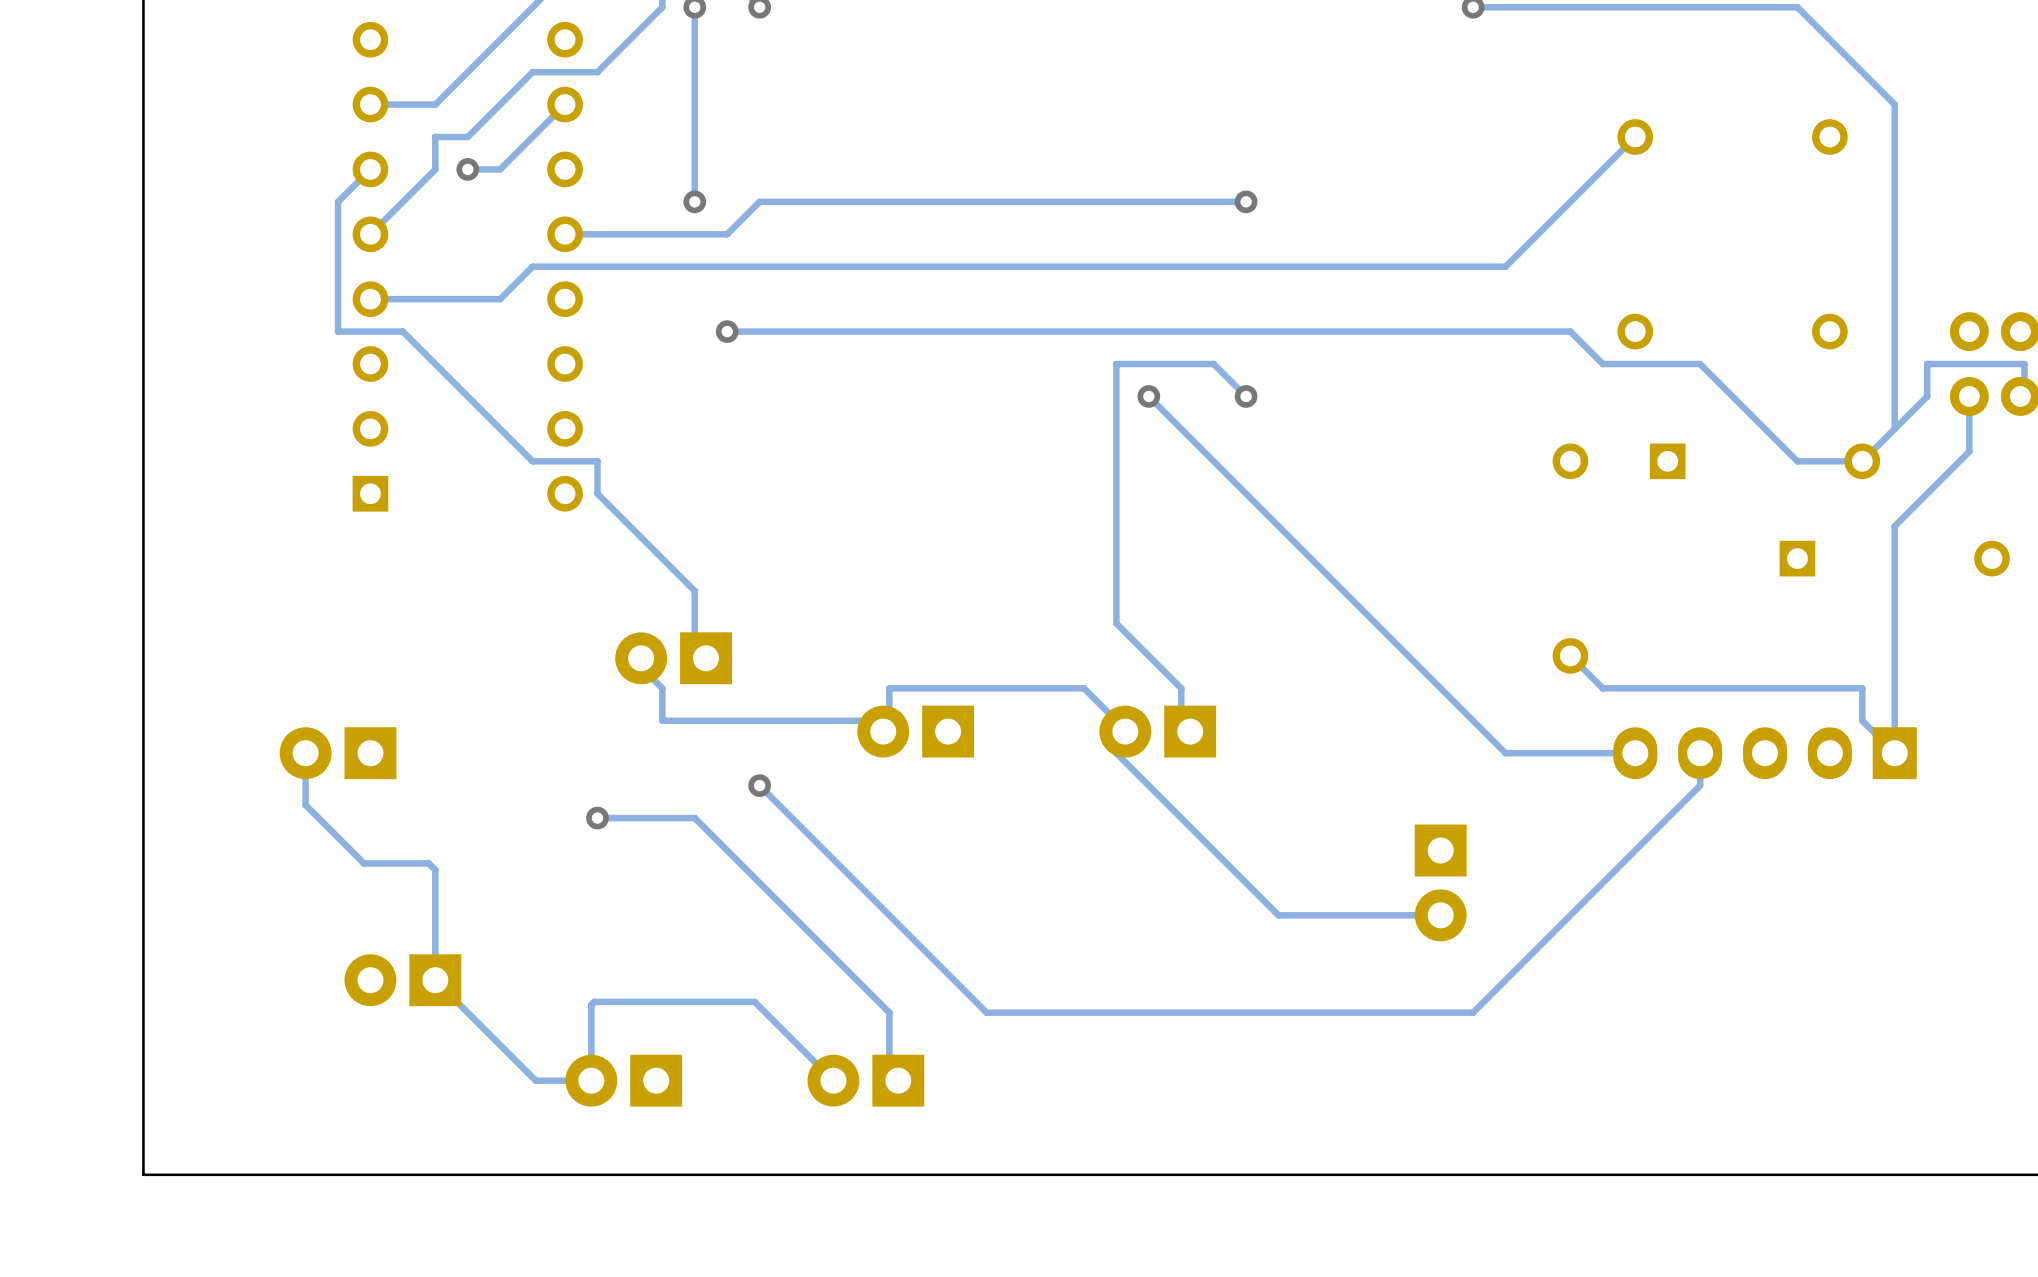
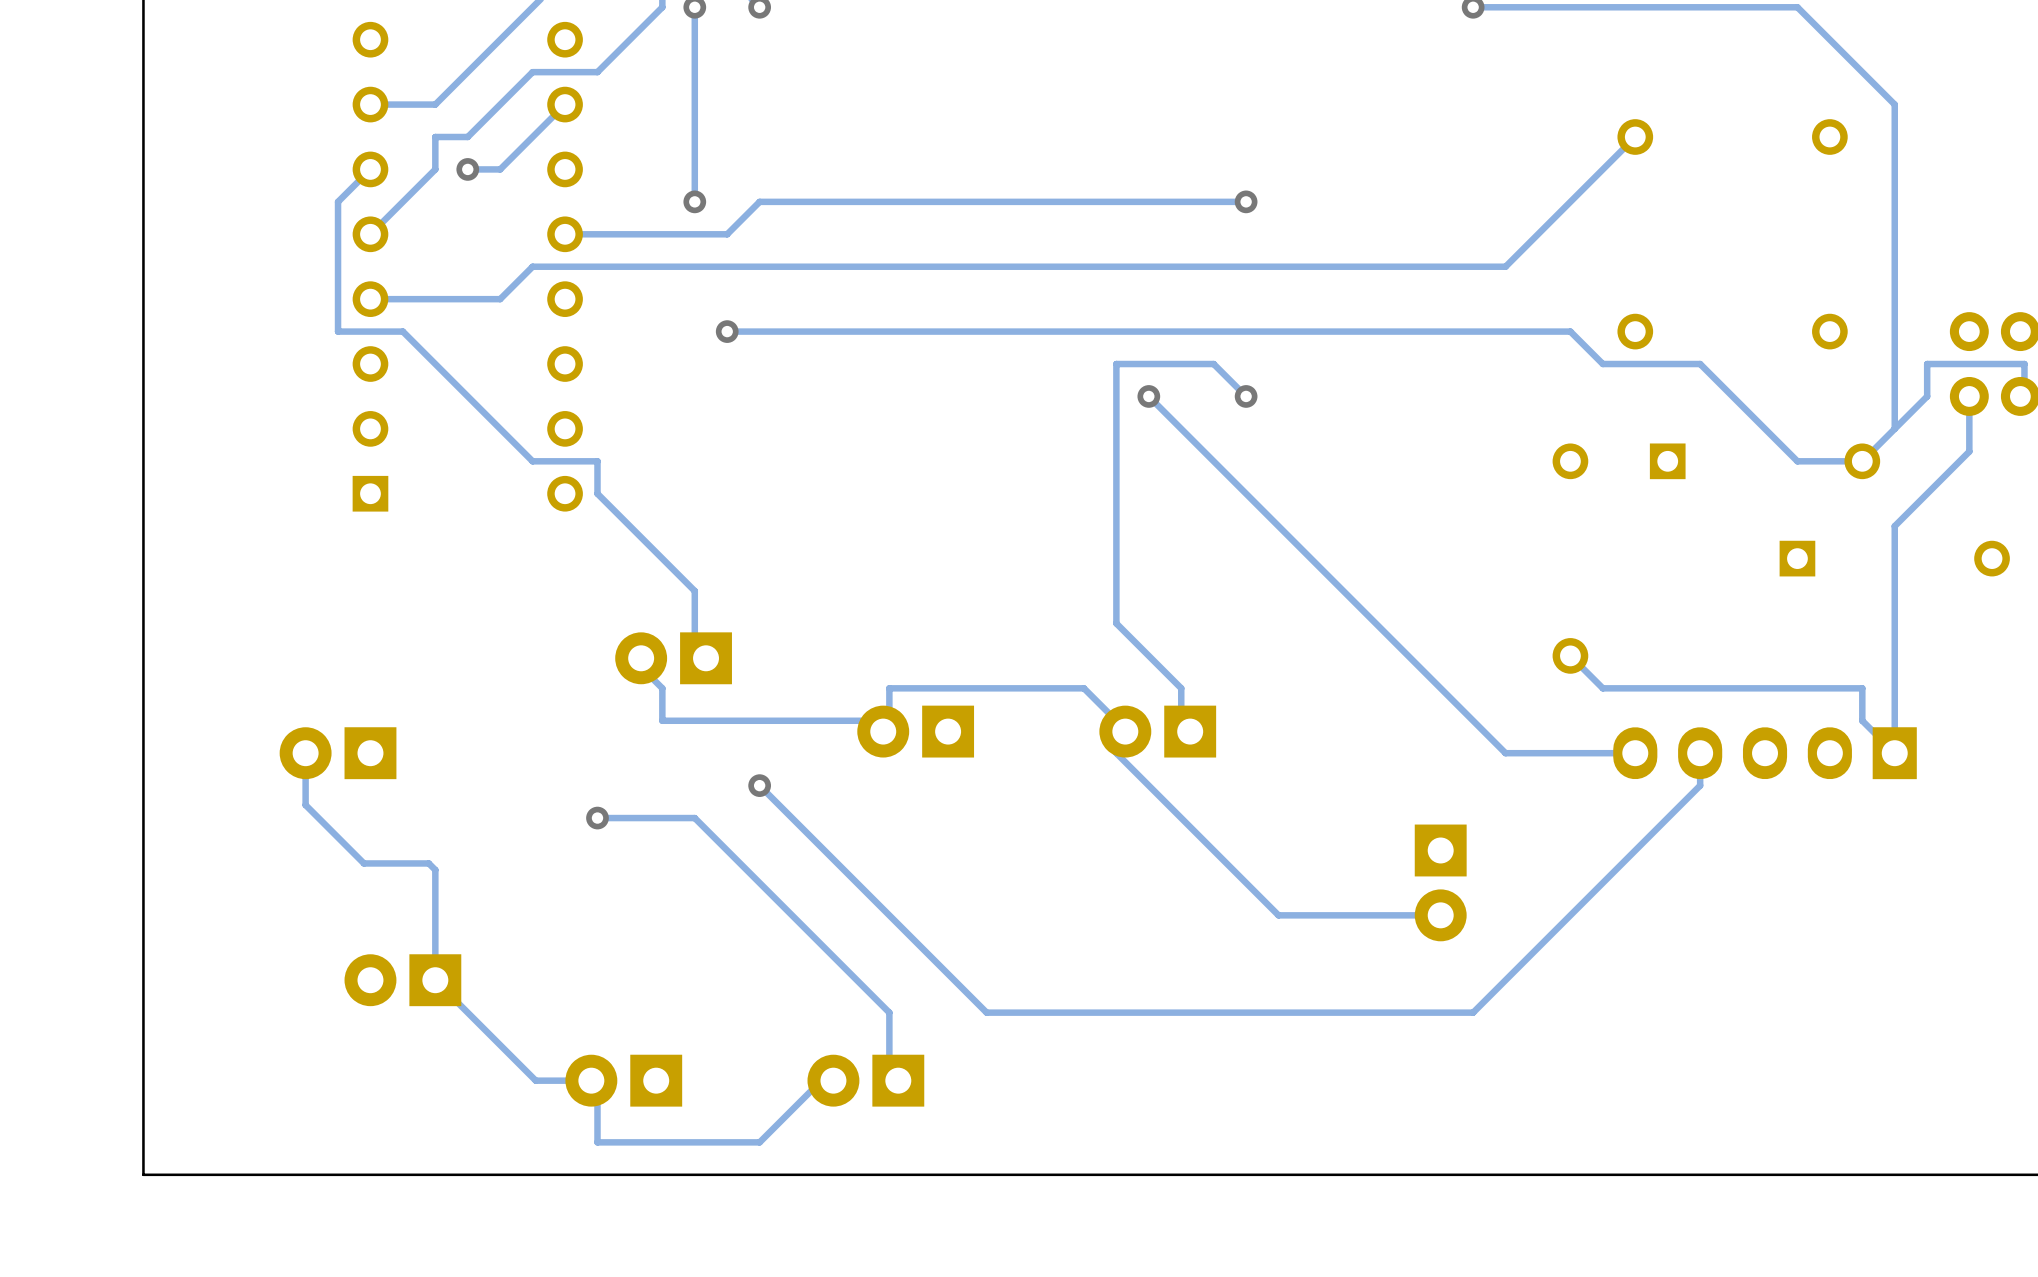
track: none -> (824, 1077) (759, 1142) (597, 1142) (597, 1077)
track: (833, 1080) (754, 1001) (594, 1001) (591, 1004) (591, 1080) -> none

